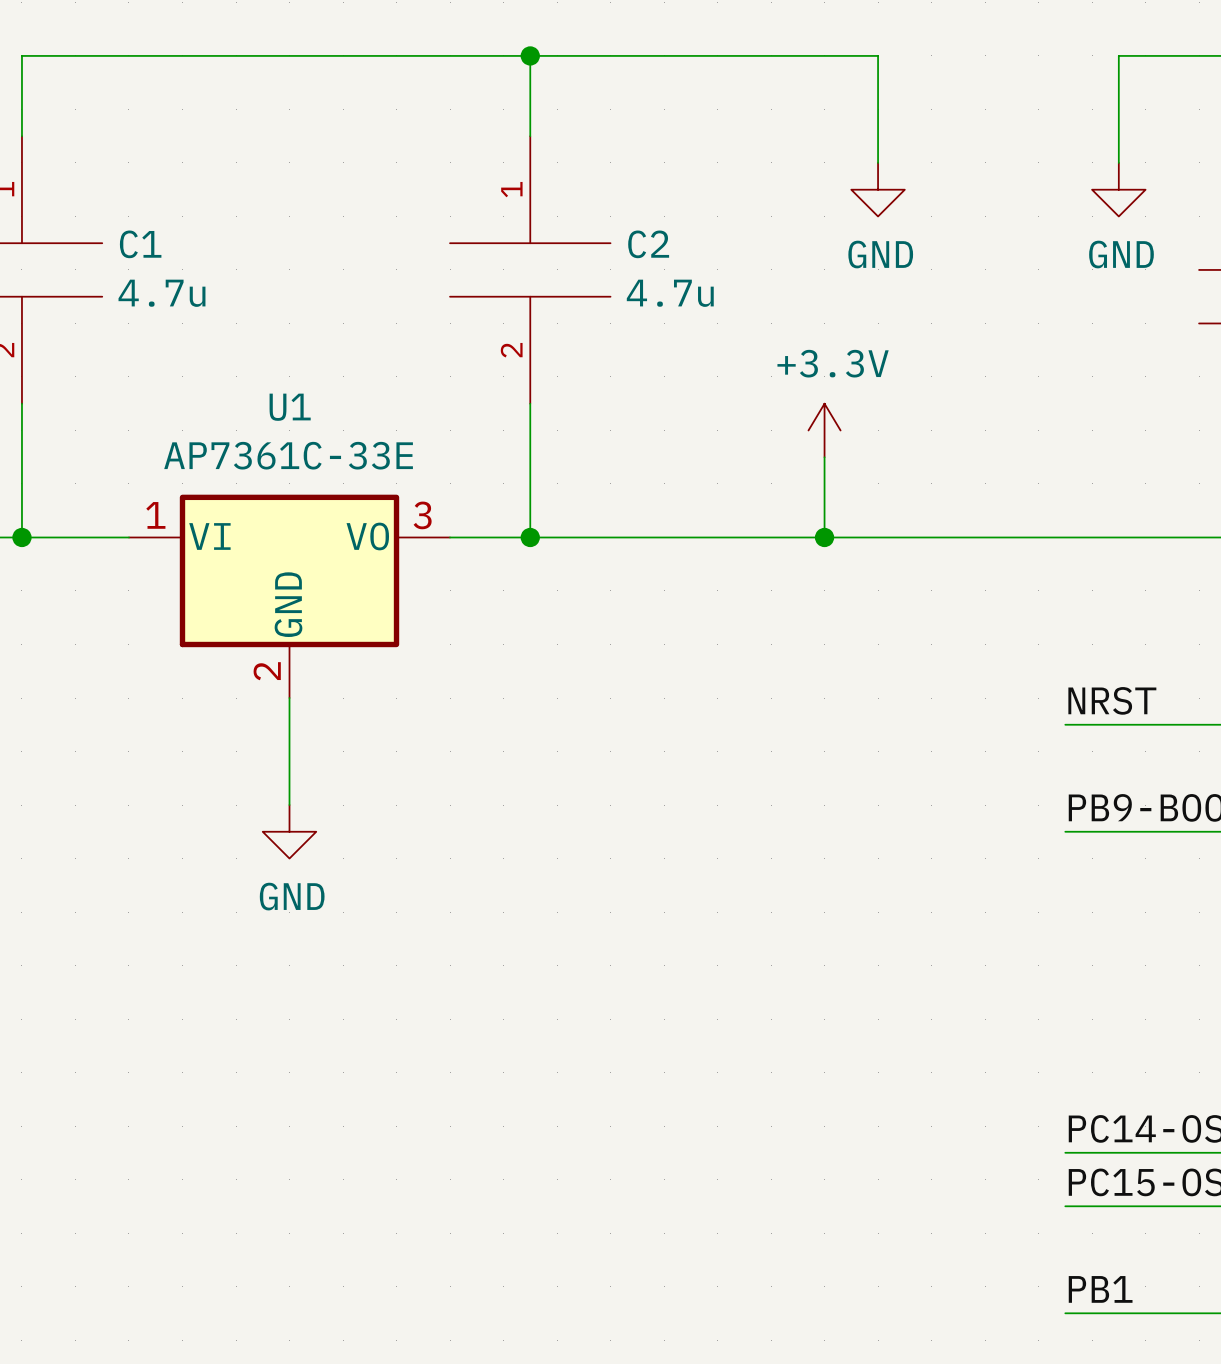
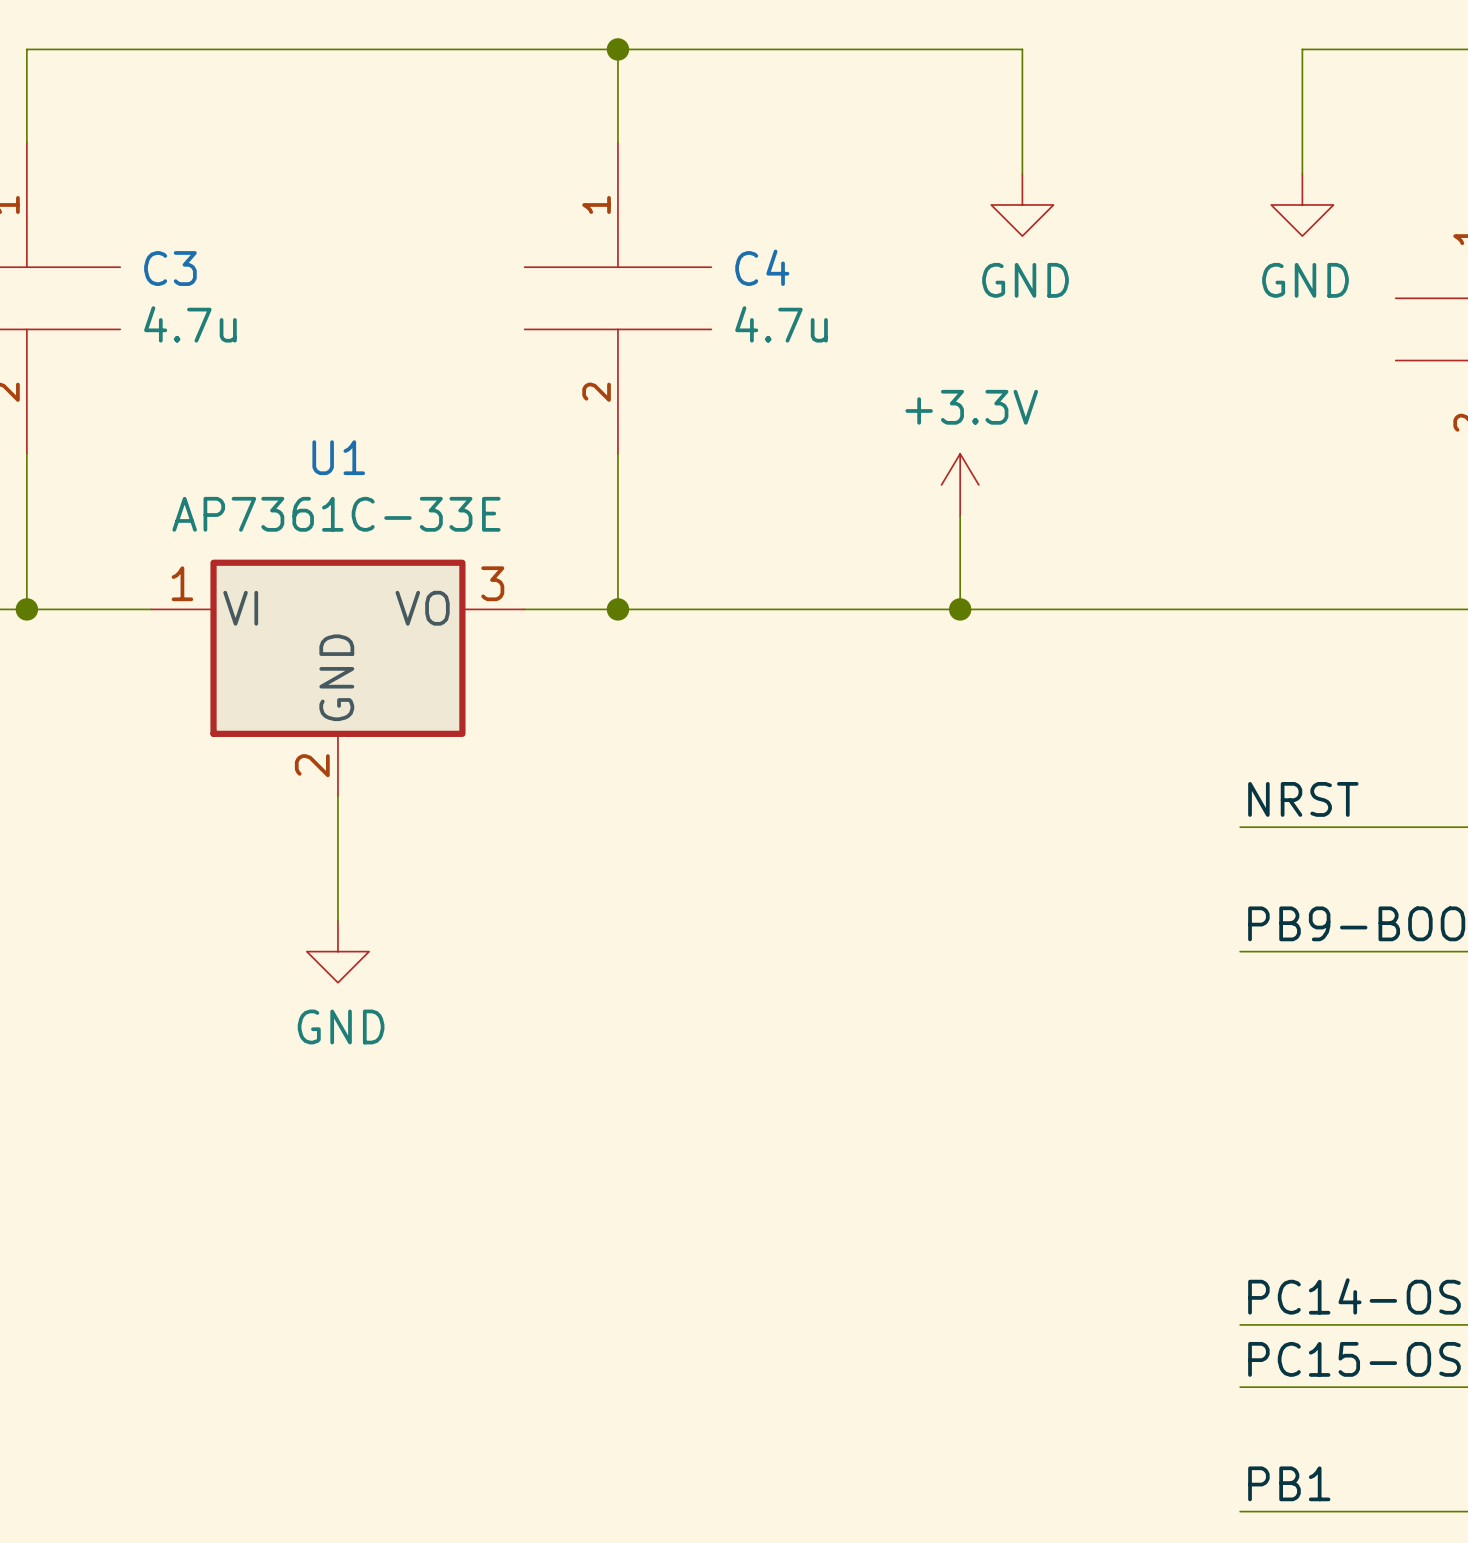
C1 name: C1 (140, 244) -> C3 (170, 268)
C2 name: C2 (648, 244) -> C4 (762, 267)

